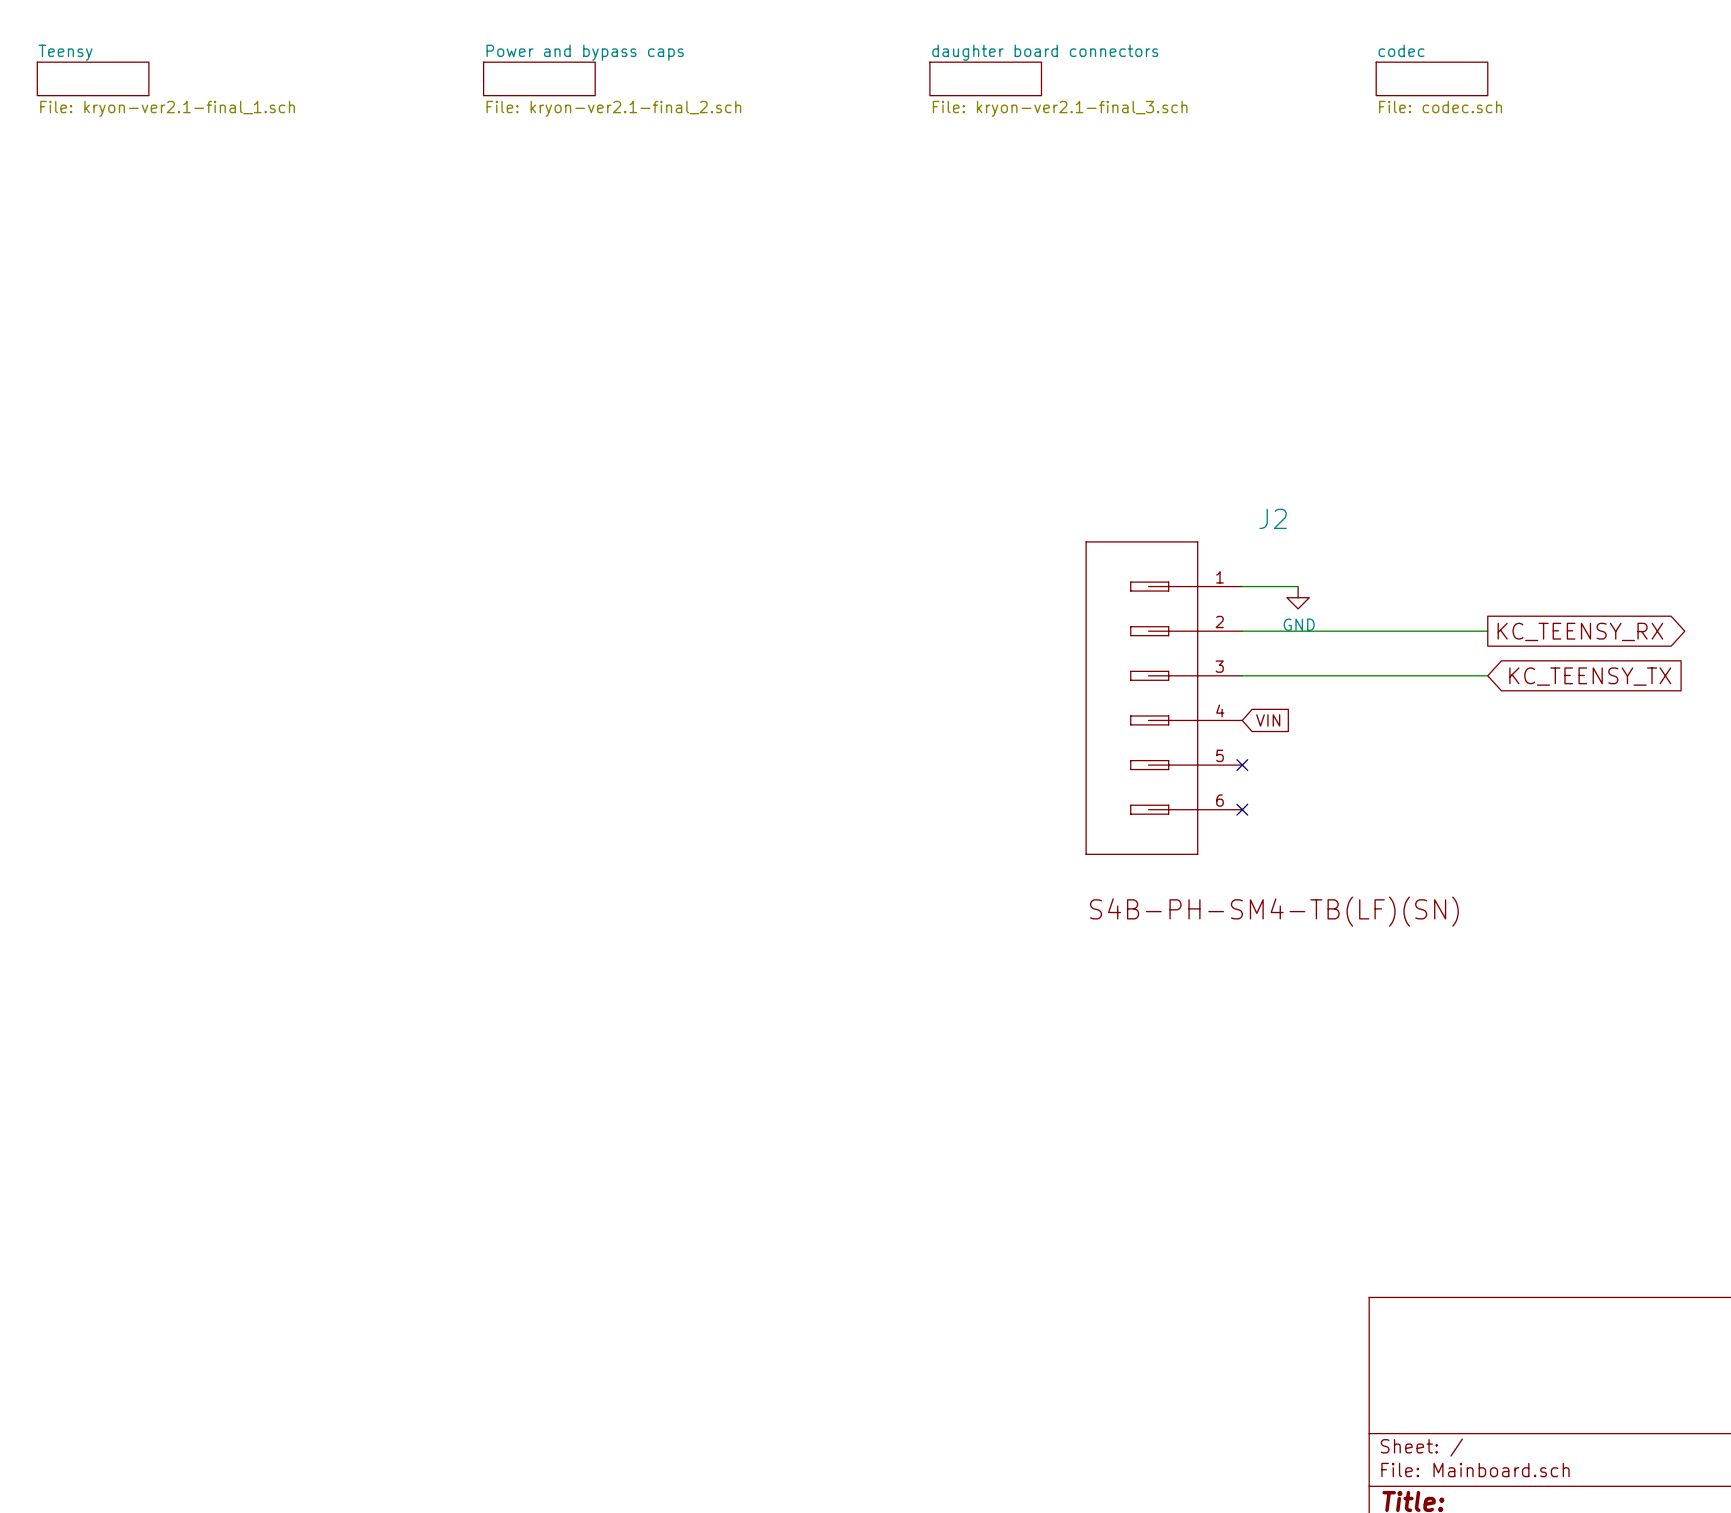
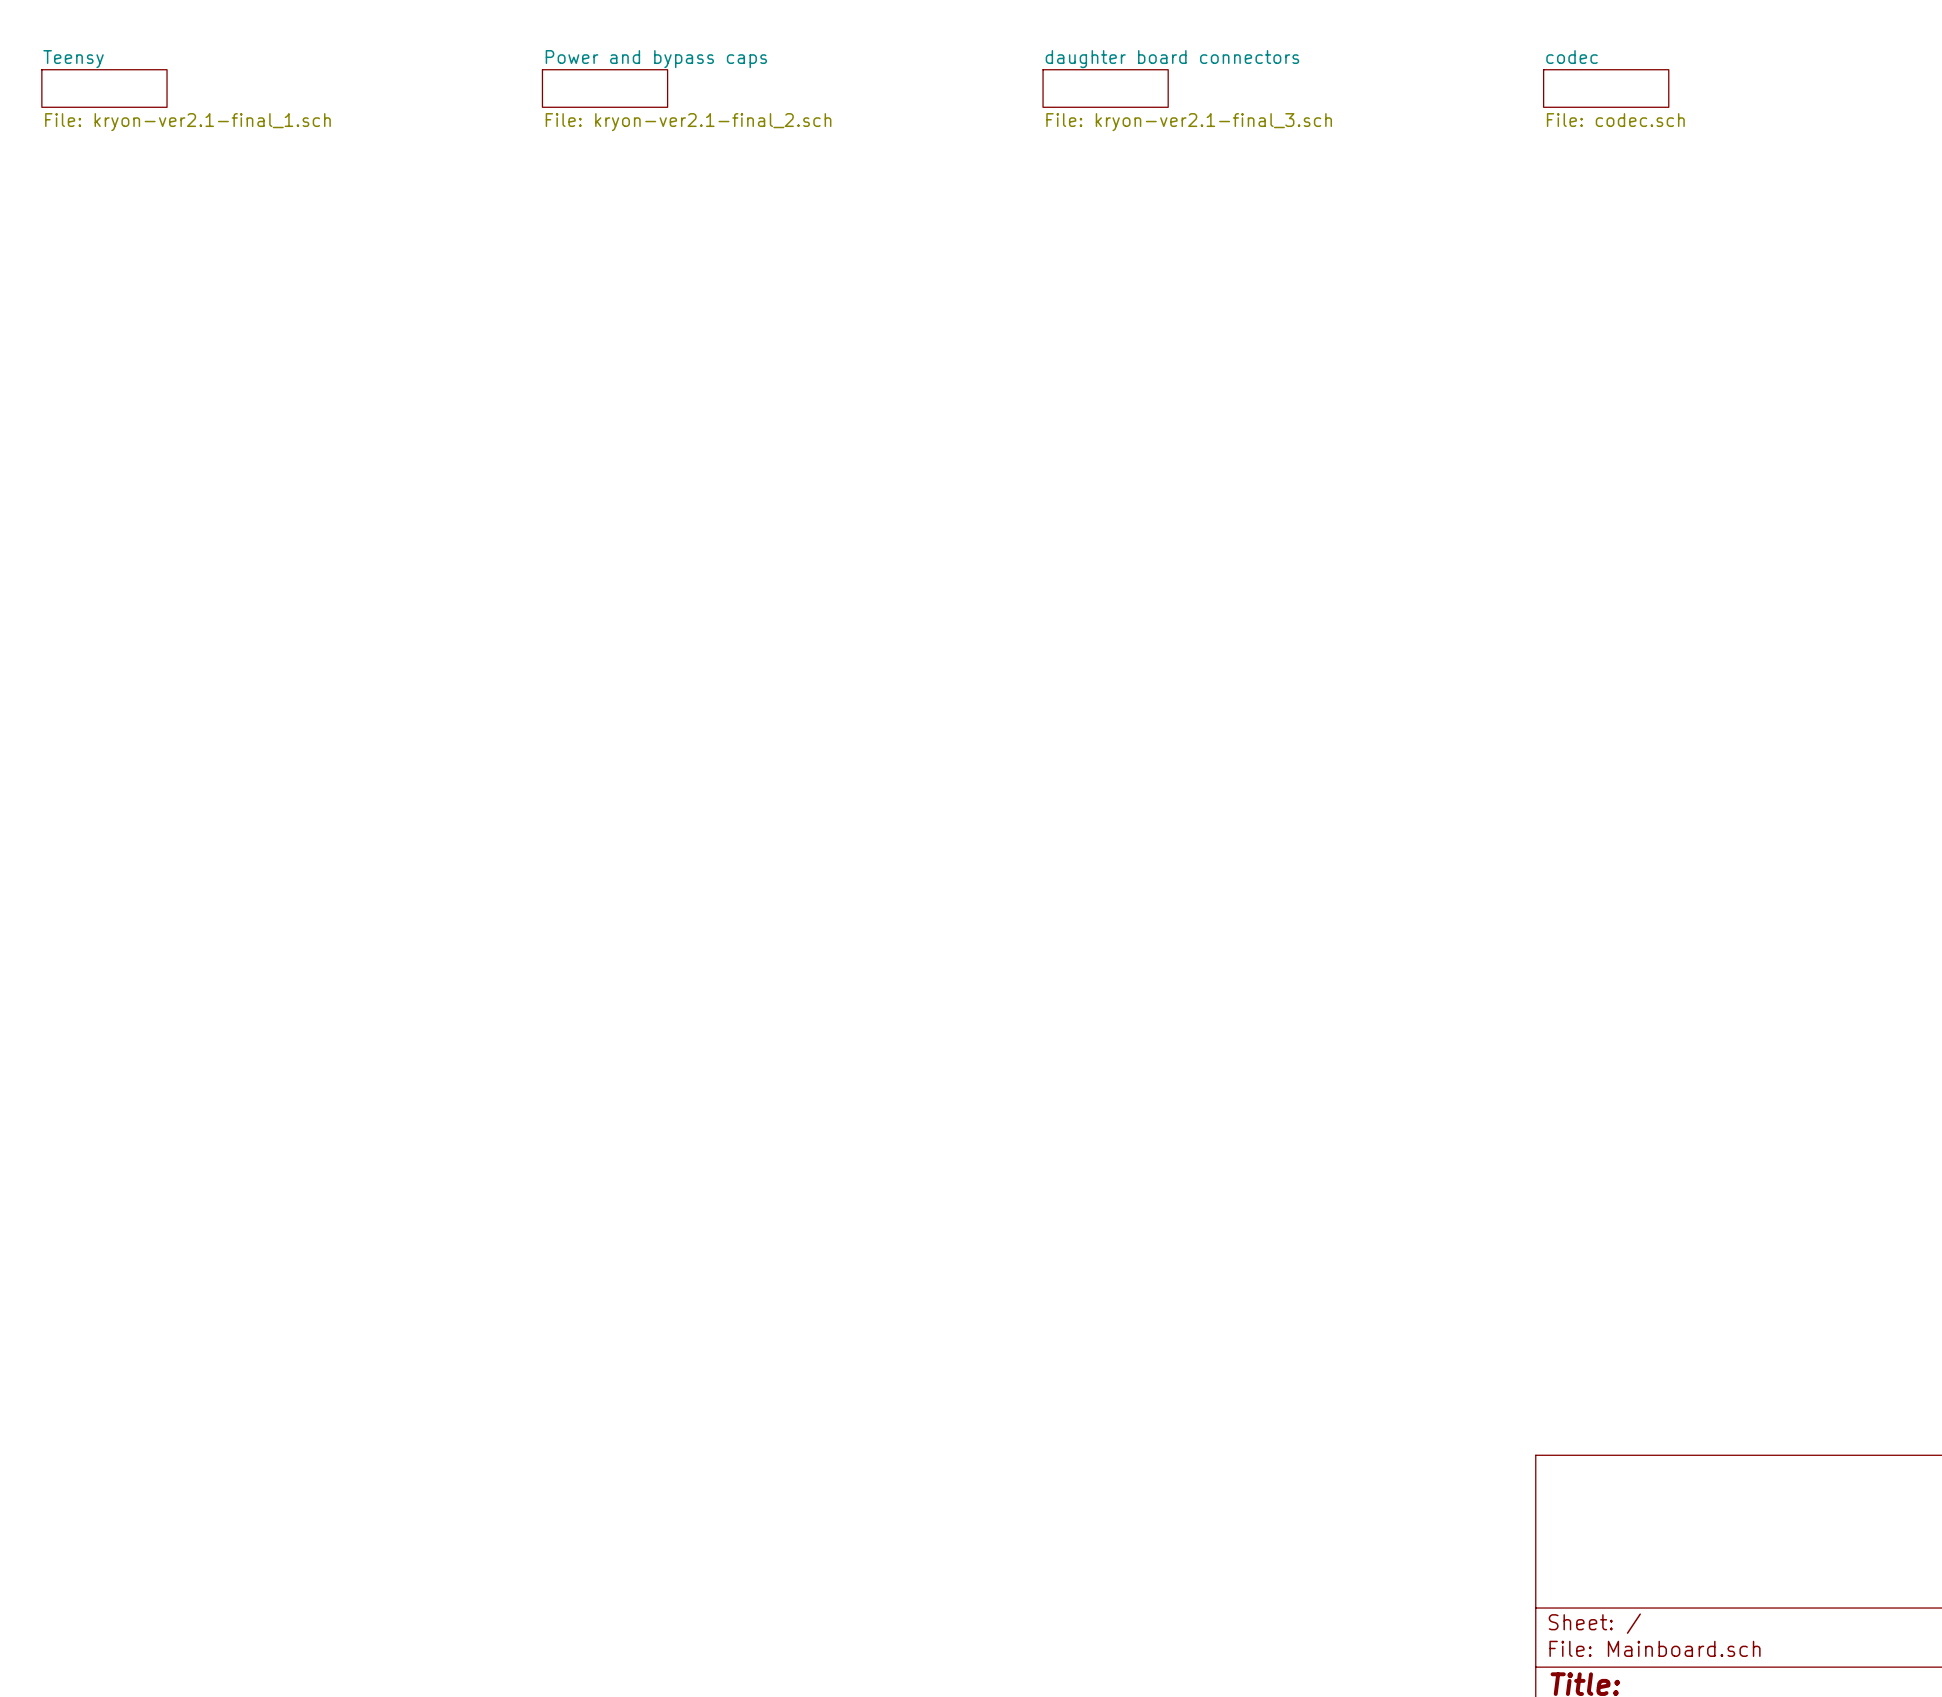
wire: (1242, 586) (1298, 586) -> none
power symbol: GND (1298, 597) -> none
wire: (1242, 631) (1487, 631) -> none
global label: KC_TEENSY_RX (1580, 631) -> none
wire: (1242, 675) (1487, 675) -> none
global label: KC_TEENSY_TX (1590, 676) -> none
J2: (1164, 698) -> none
global label: VIN (1268, 720) -> none
no-connect mark: (1242, 765) -> none
no-connect mark: (1242, 809) -> none

